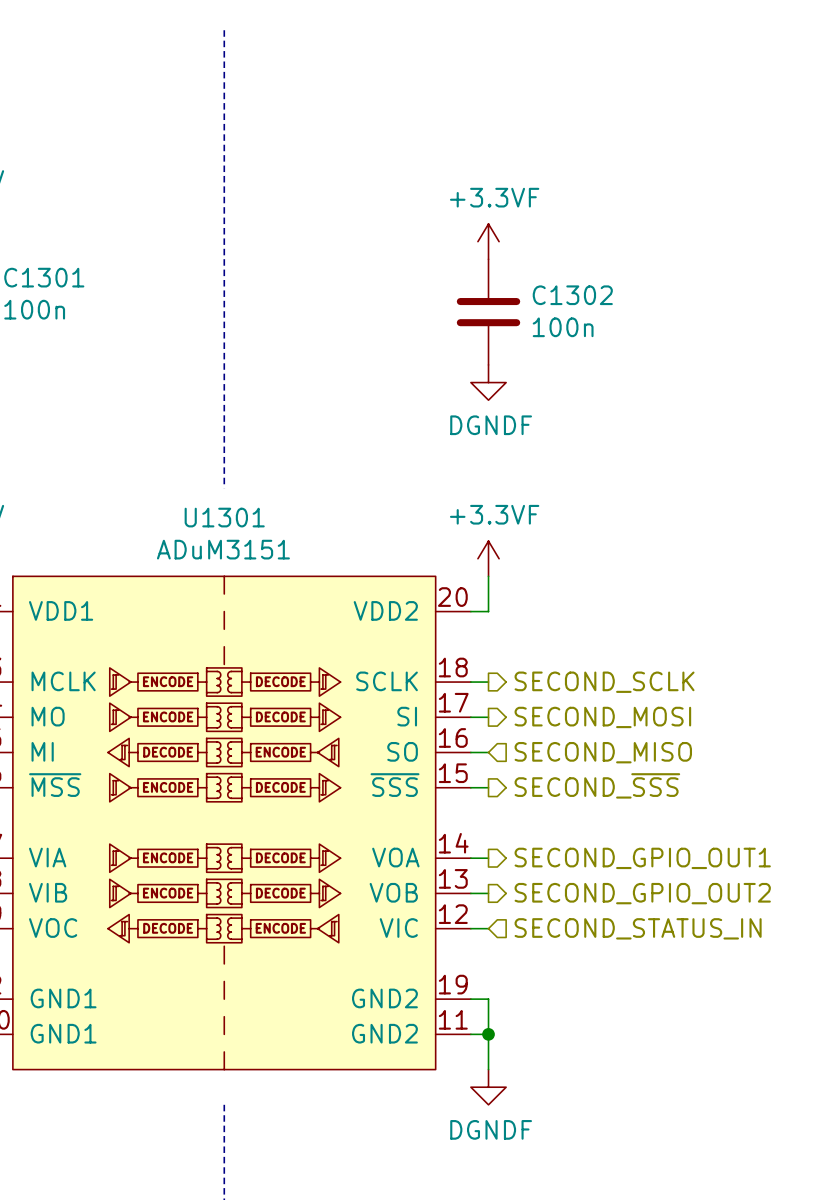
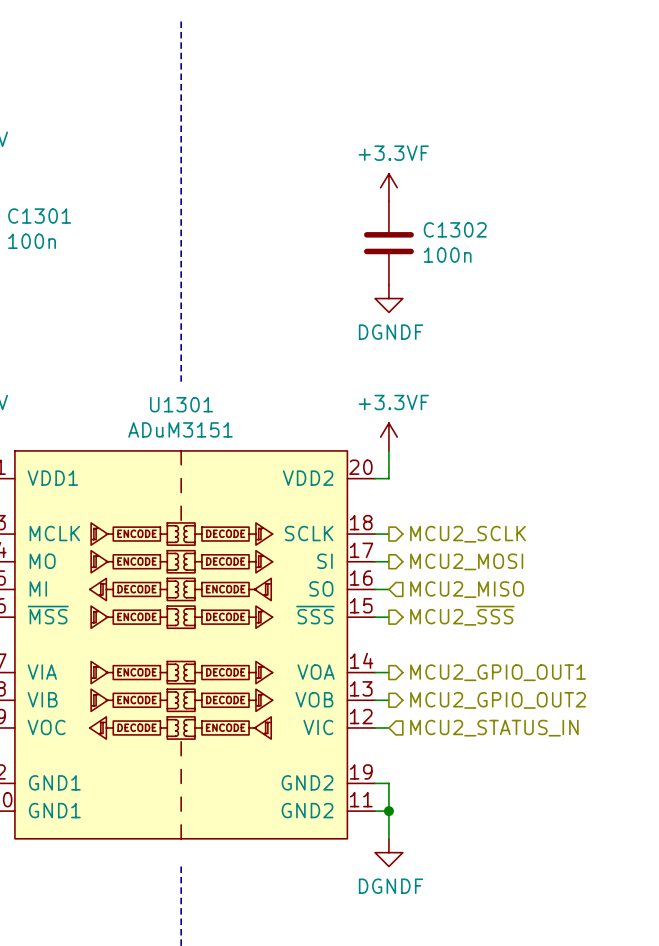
hierarchical label: SECOND_SCLK (604, 682) -> MCU2_SCLK (467, 534)
hierarchical label: SECOND_MOSI (602, 717) -> MCU2_MOSI (466, 561)
hierarchical label: SECOND_MISO (603, 752) -> MCU2_MISO (467, 589)
hierarchical label: SECOND_~{SSS} (597, 785) -> MCU2_~{SSS} (462, 615)
hierarchical label: SECOND_GPIO_OUT1 (642, 858) -> MCU2_GPIO_OUT1 (498, 672)
hierarchical label: SECOND_GPIO_OUT2 (642, 893) -> MCU2_GPIO_OUT2 (498, 700)
hierarchical label: SECOND_STATUS_IN (638, 928) -> MCU2_STATUS_IN (494, 728)

